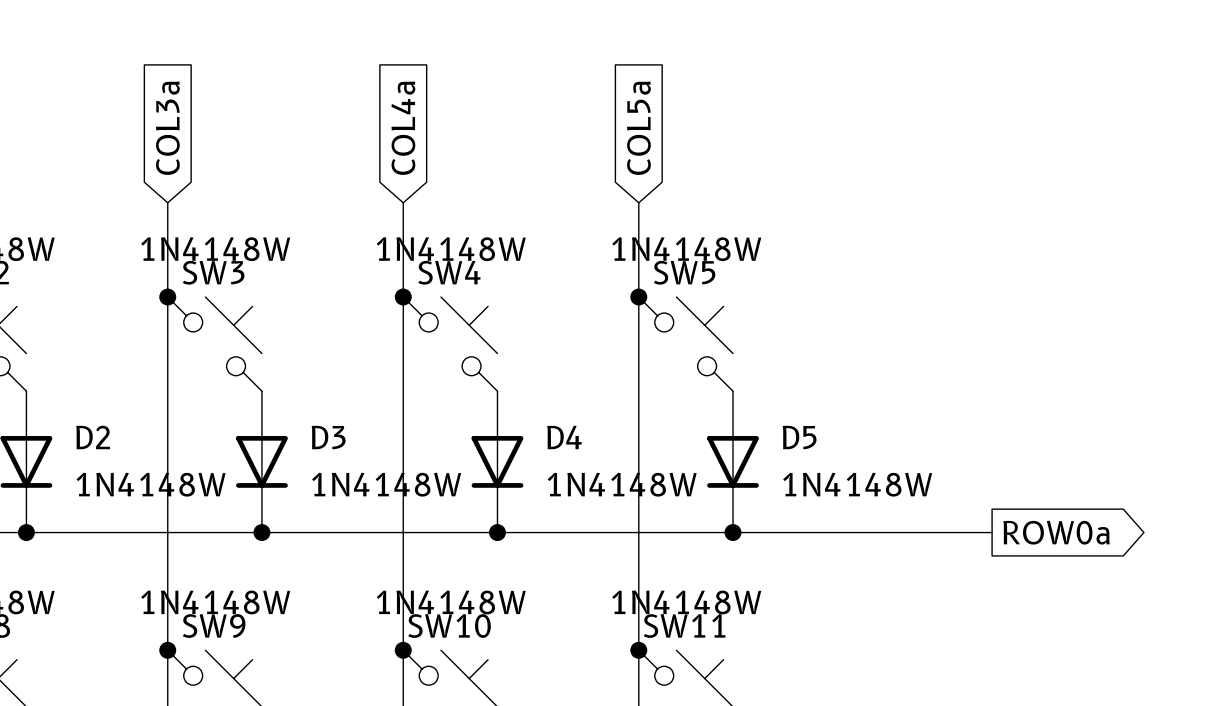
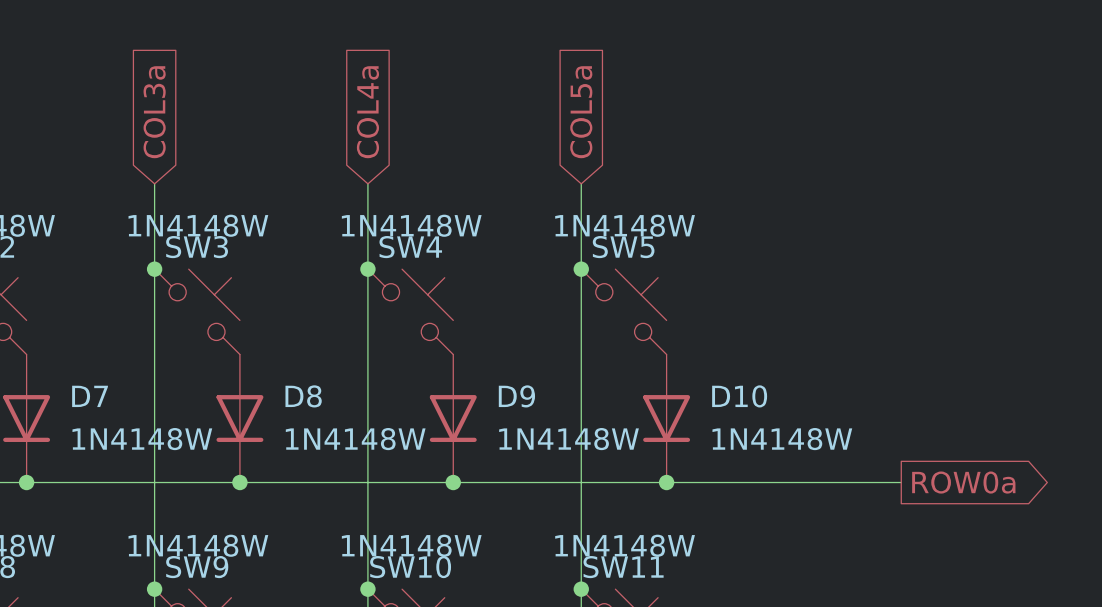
D2 name: D2 (93, 437) -> D7 (90, 396)
D3 name: D3 (328, 437) -> D8 (303, 396)
D4 name: D4 (564, 437) -> D9 (516, 396)
D5 name: D5 (799, 437) -> D10 (739, 396)

